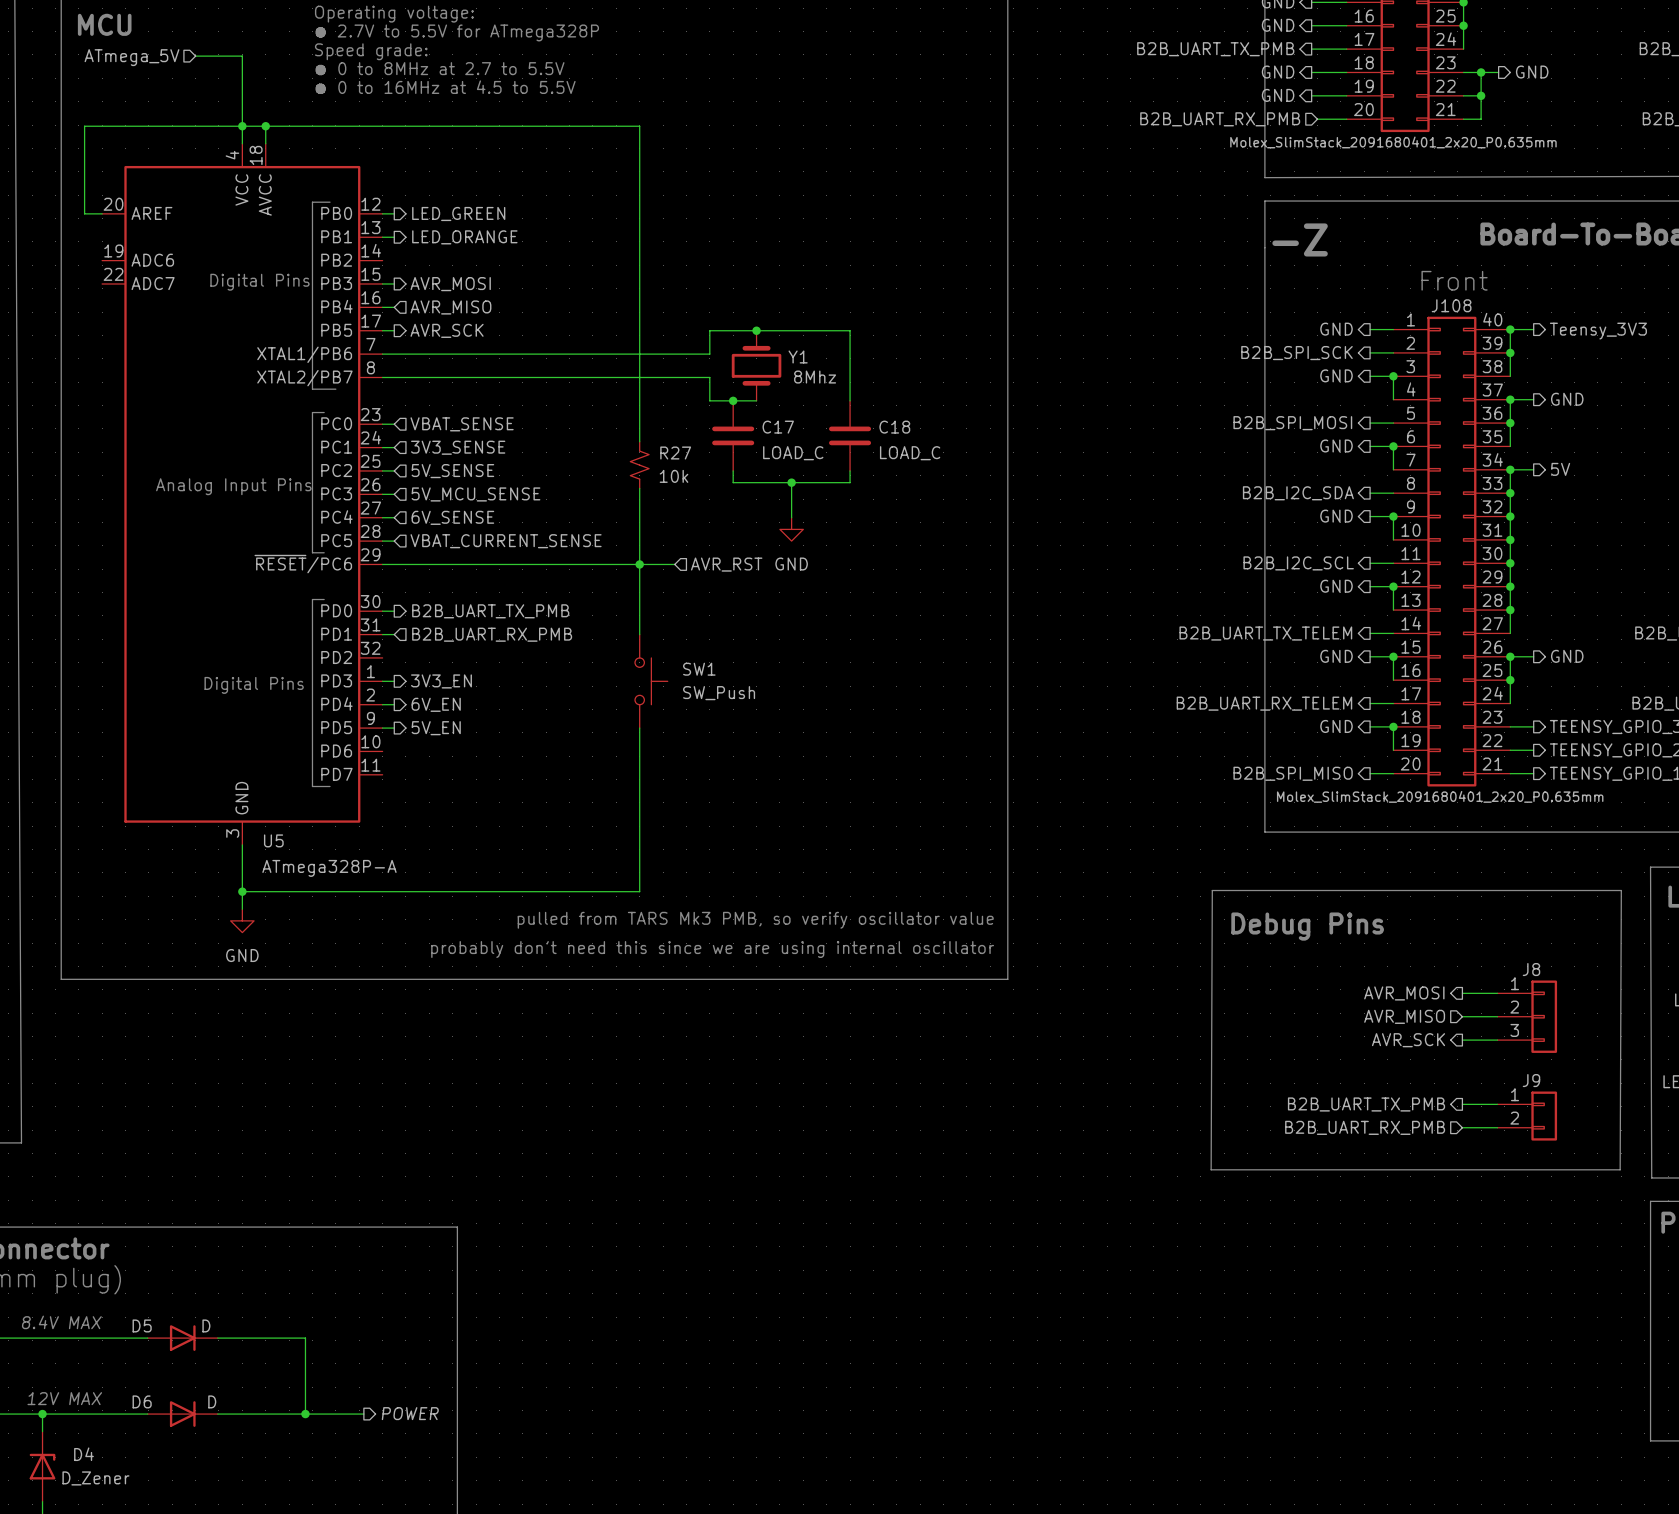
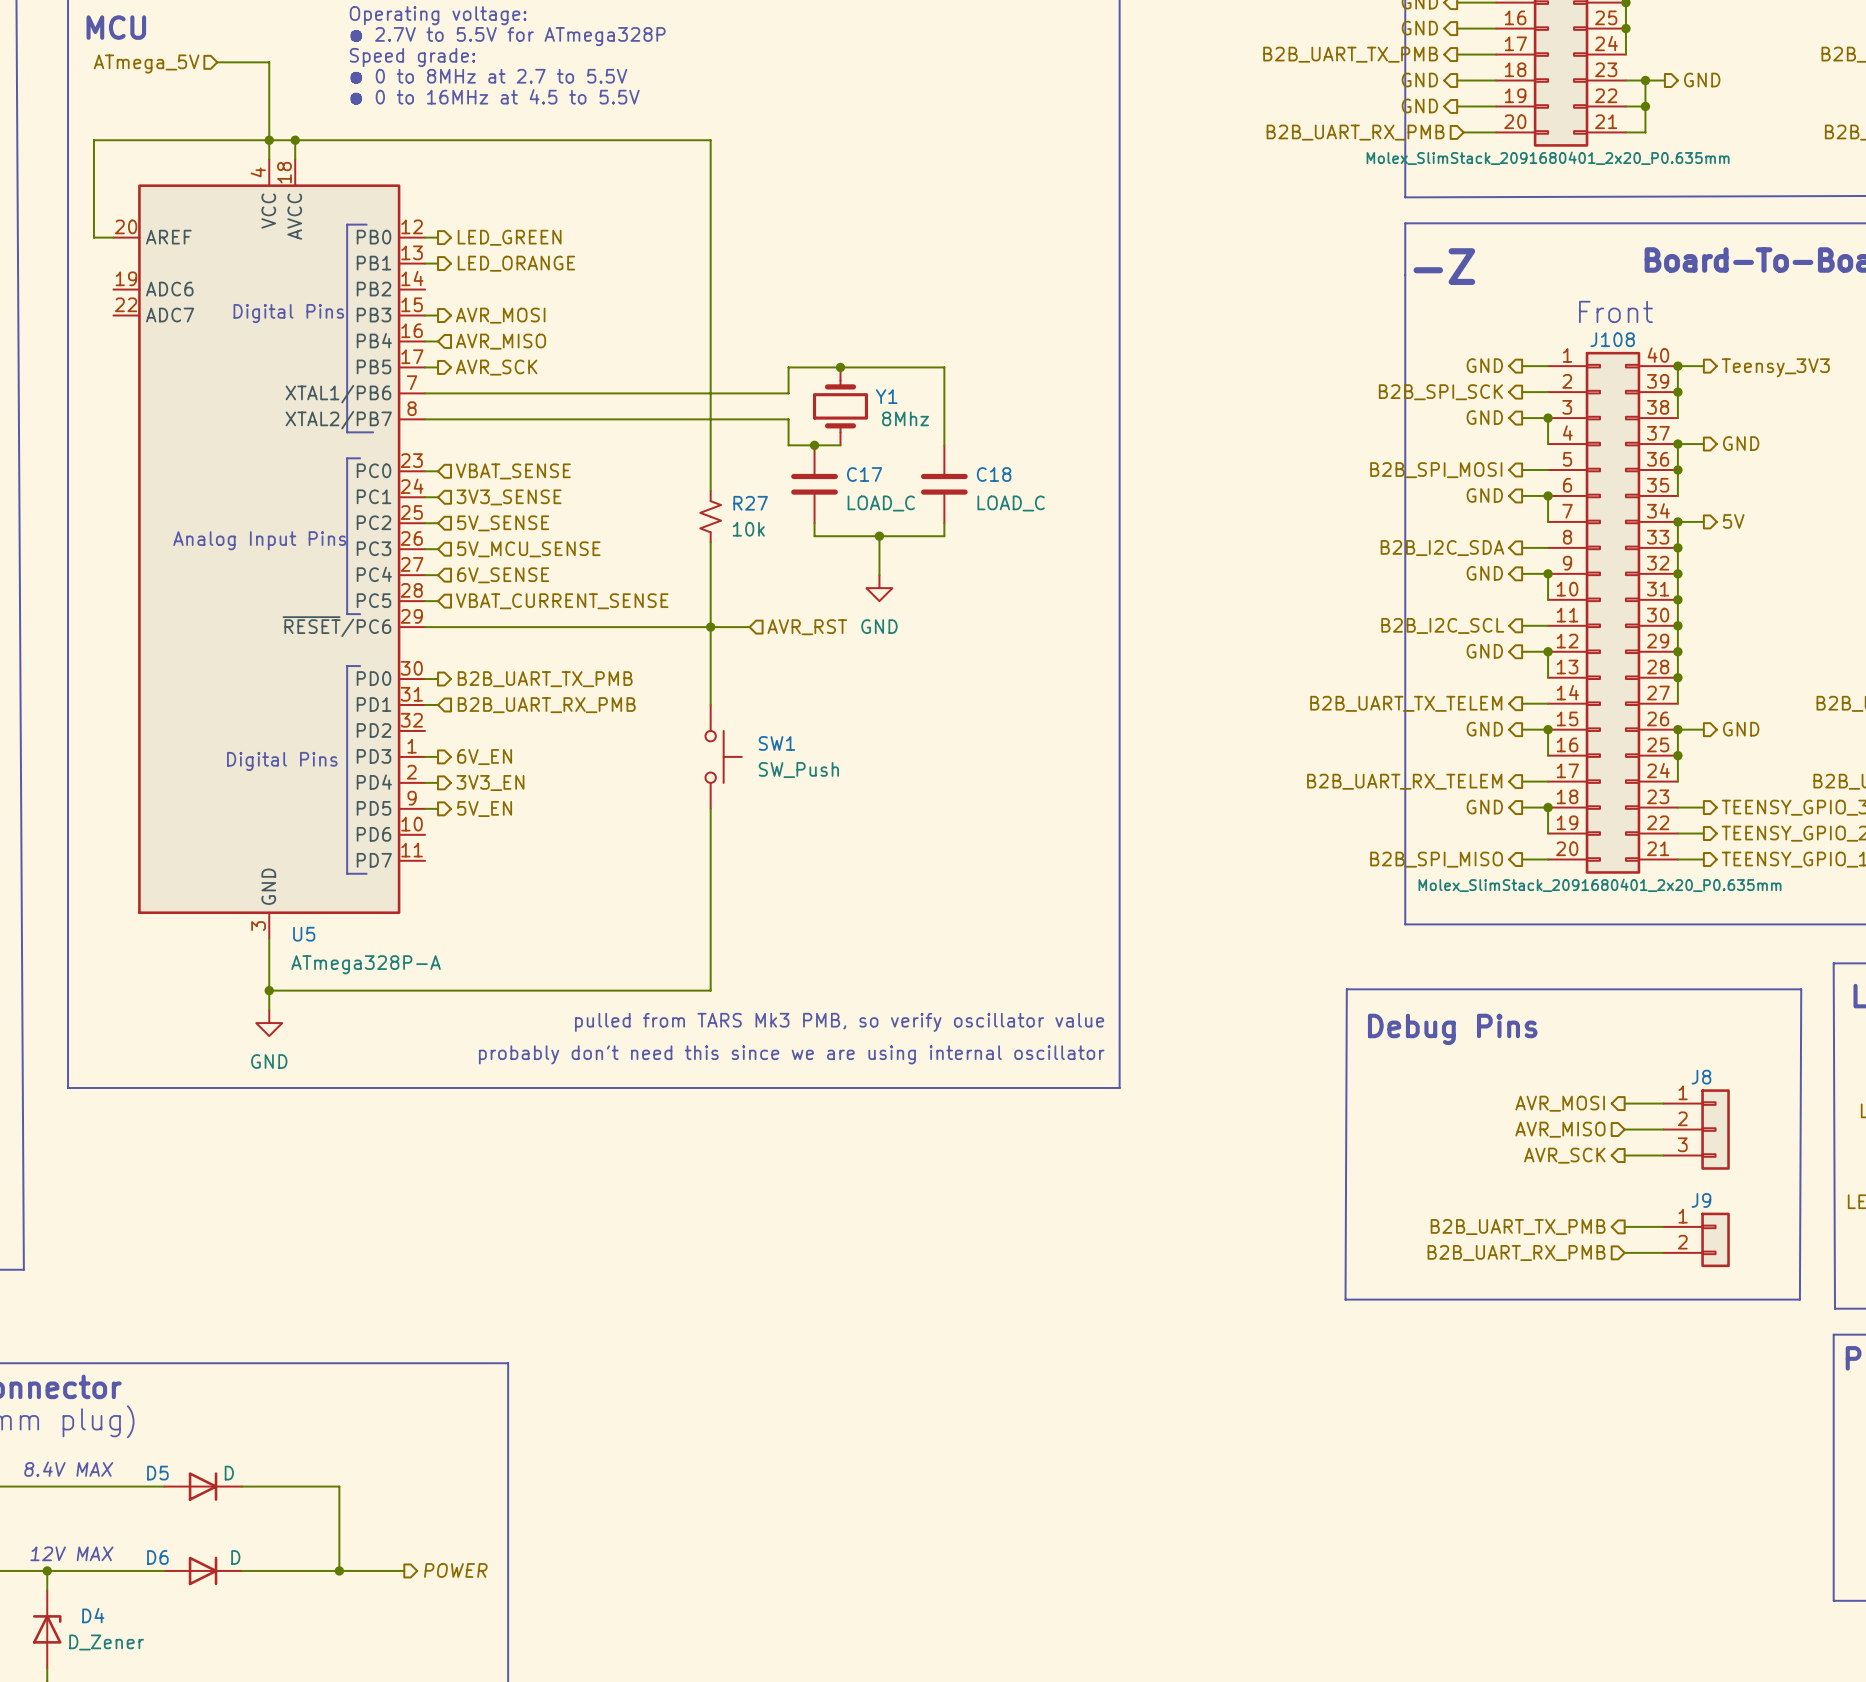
hierarchical label: 3V3_EN (441, 681) -> 6V_EN (484, 757)
hierarchical label: 6V_EN (436, 704) -> 3V3_EN (490, 783)

